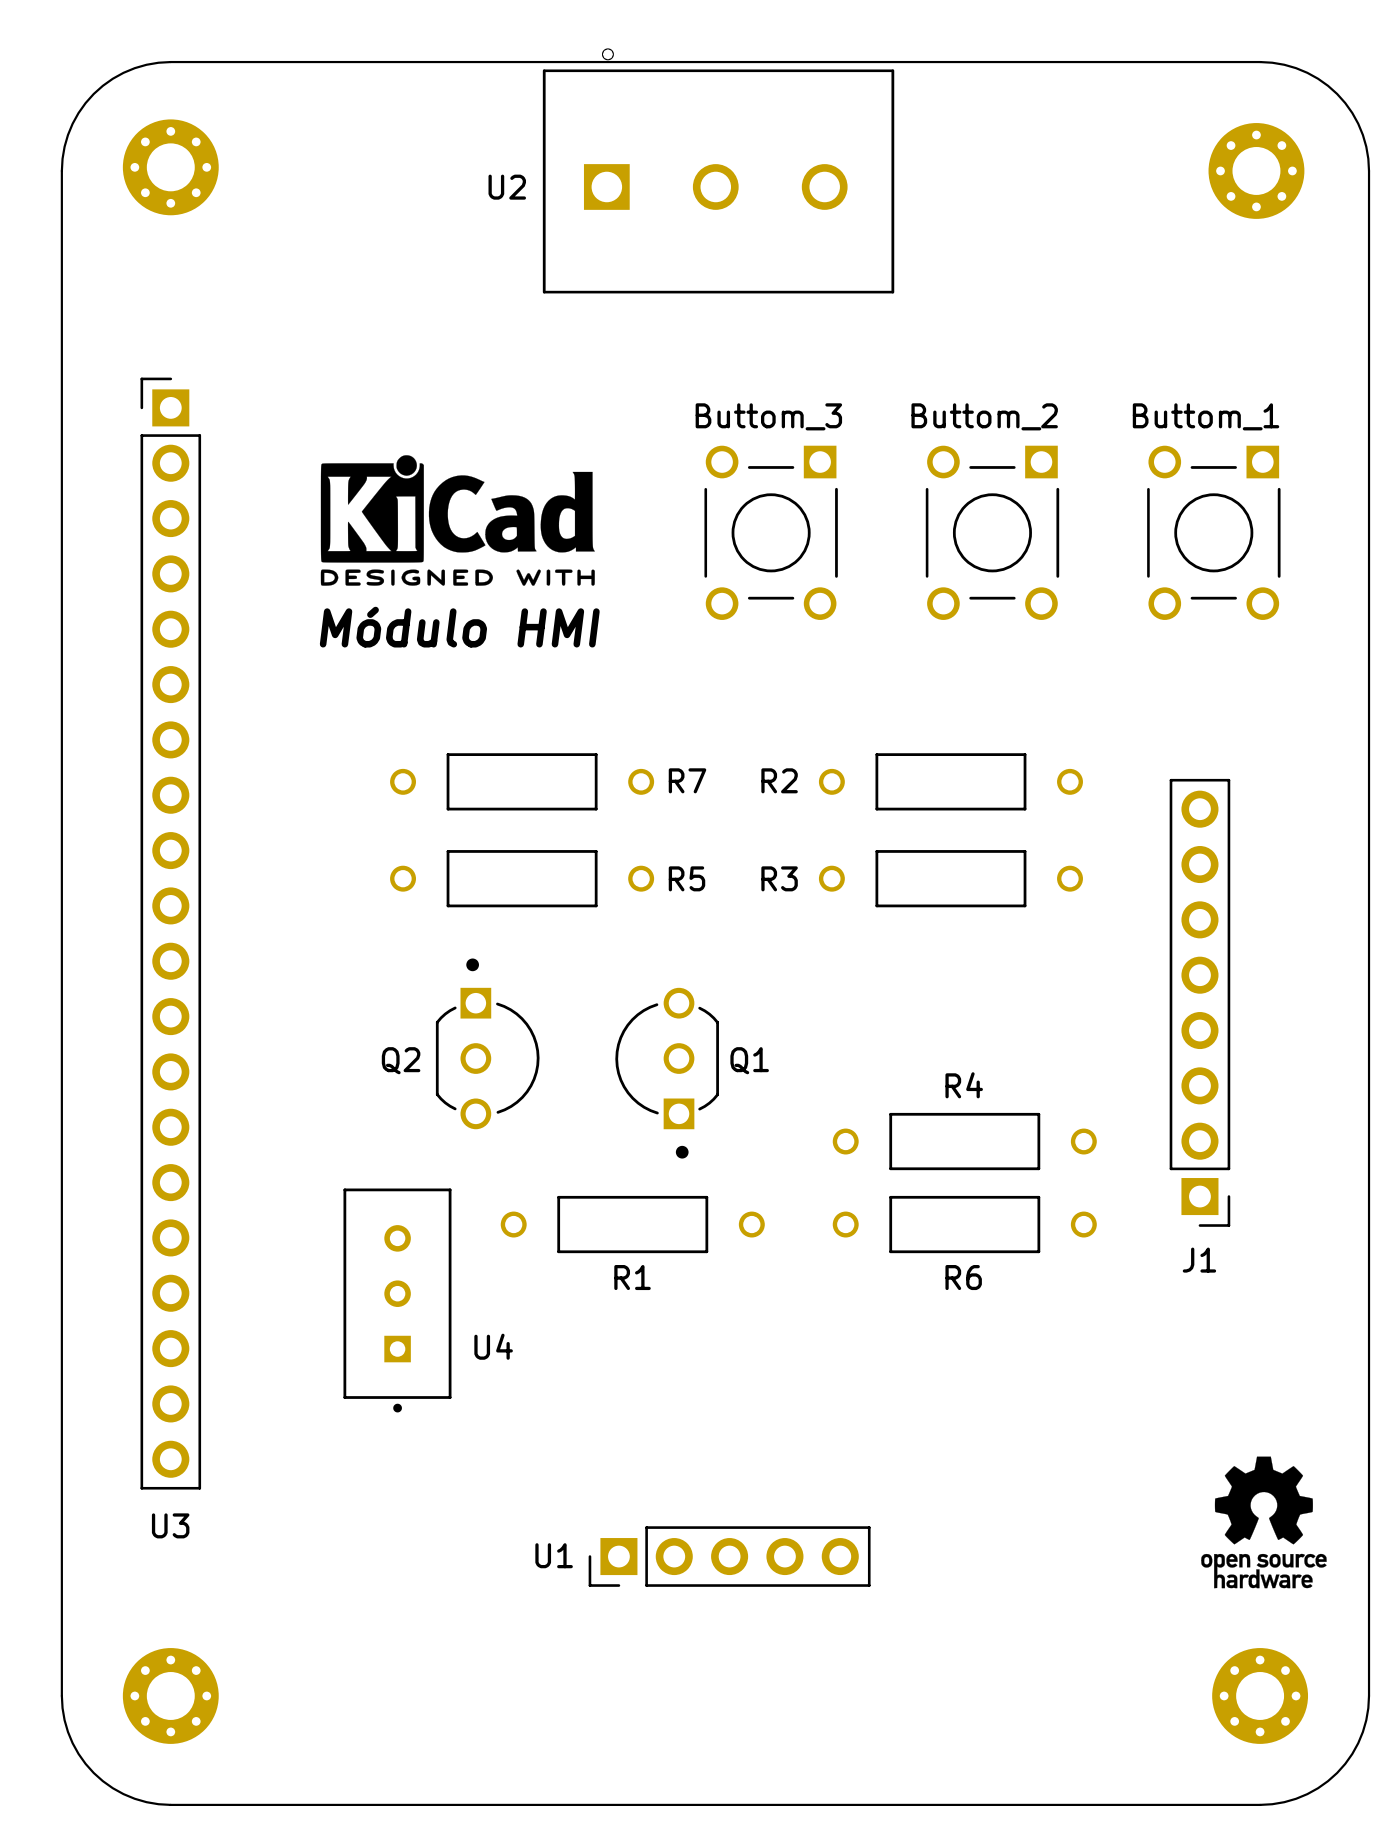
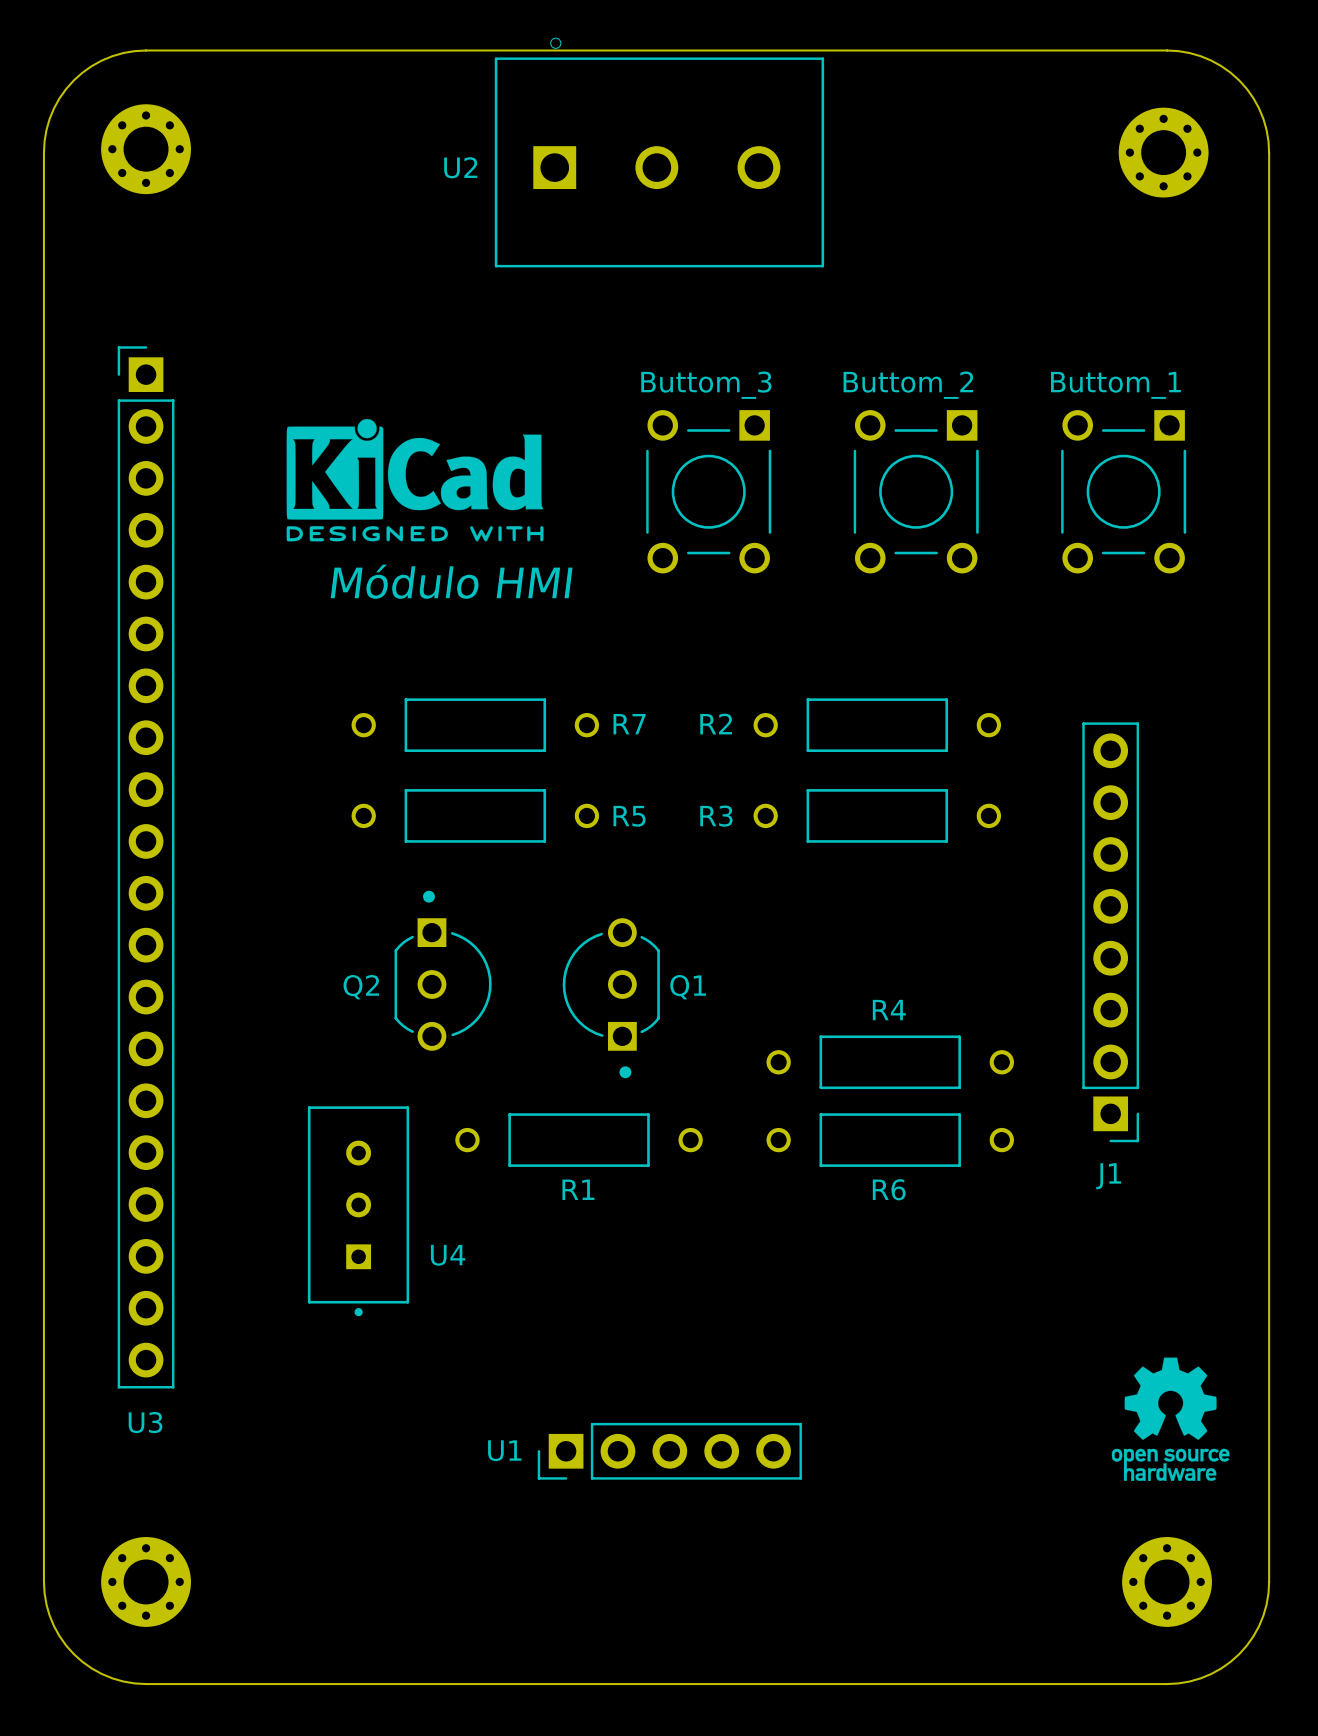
text position: Módulo HMI (459, 627) -> Módulo HMI (451, 581)

